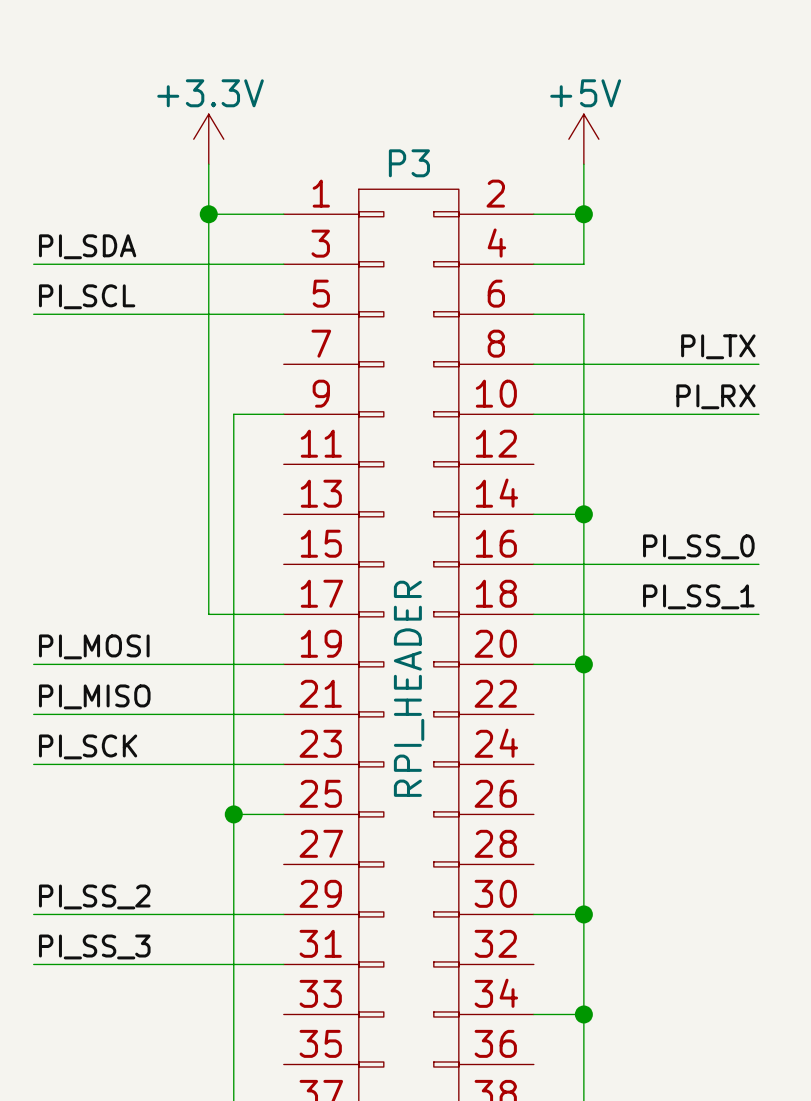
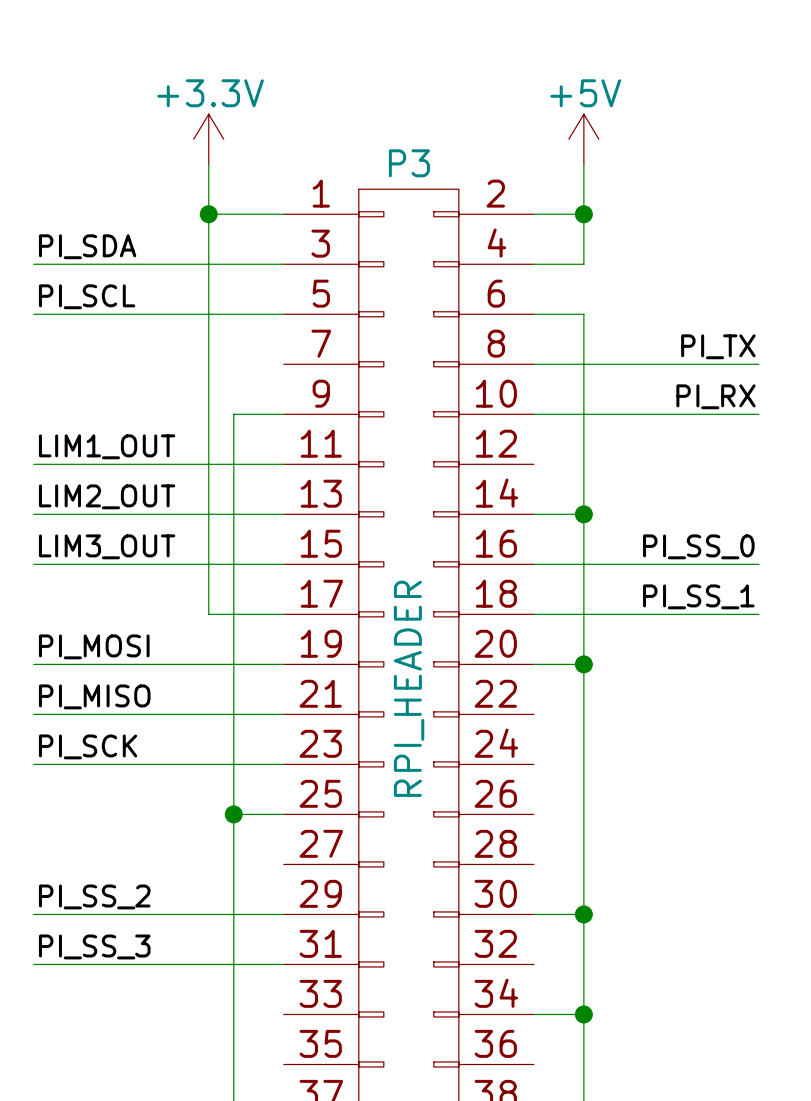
label: none -> LIM1_OUT (107, 446)
wire: none -> (33, 464) (283, 464)
label: none -> LIM2_OUT (107, 496)
wire: none -> (33, 514) (283, 514)
label: none -> LIM3_OUT (107, 546)
wire: none -> (33, 564) (283, 564)

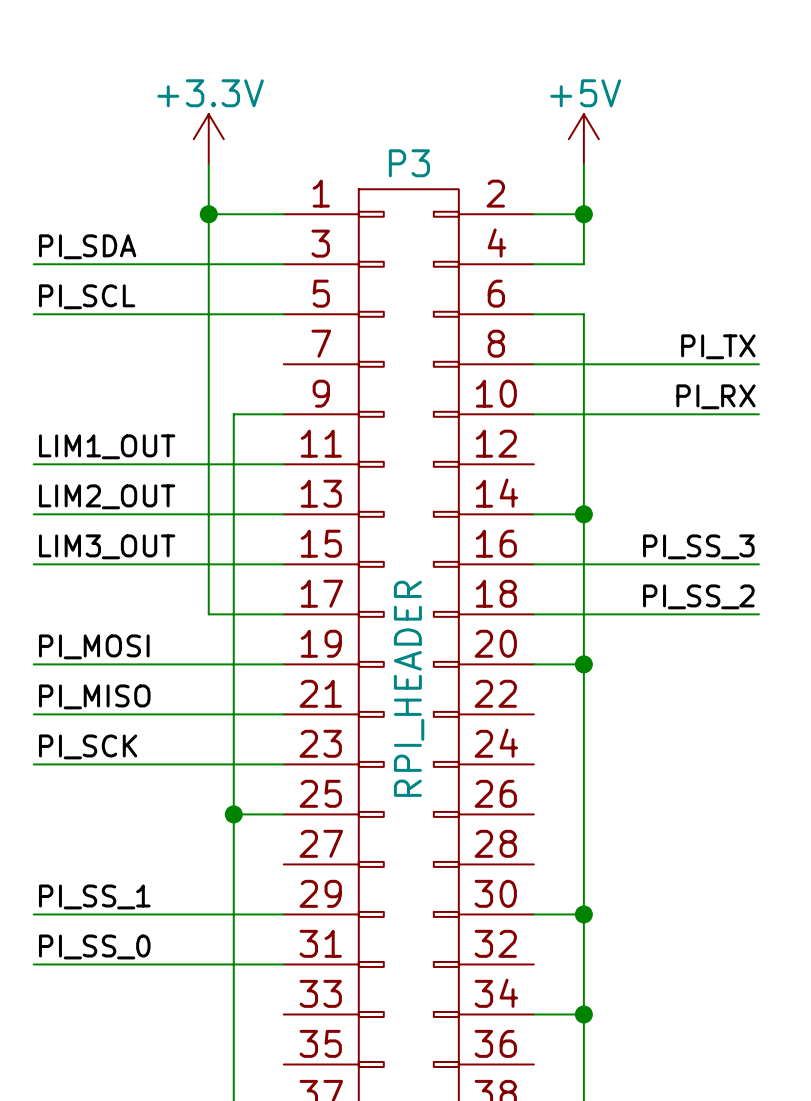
label: PI_SS_0 (698, 546) -> PI_SS_3 (698, 546)
label: PI_SS_1 (698, 596) -> PI_SS_2 (698, 596)
label: PI_SS_2 (94, 896) -> PI_SS_1 (94, 896)
label: PI_SS_3 (94, 946) -> PI_SS_0 (94, 946)

